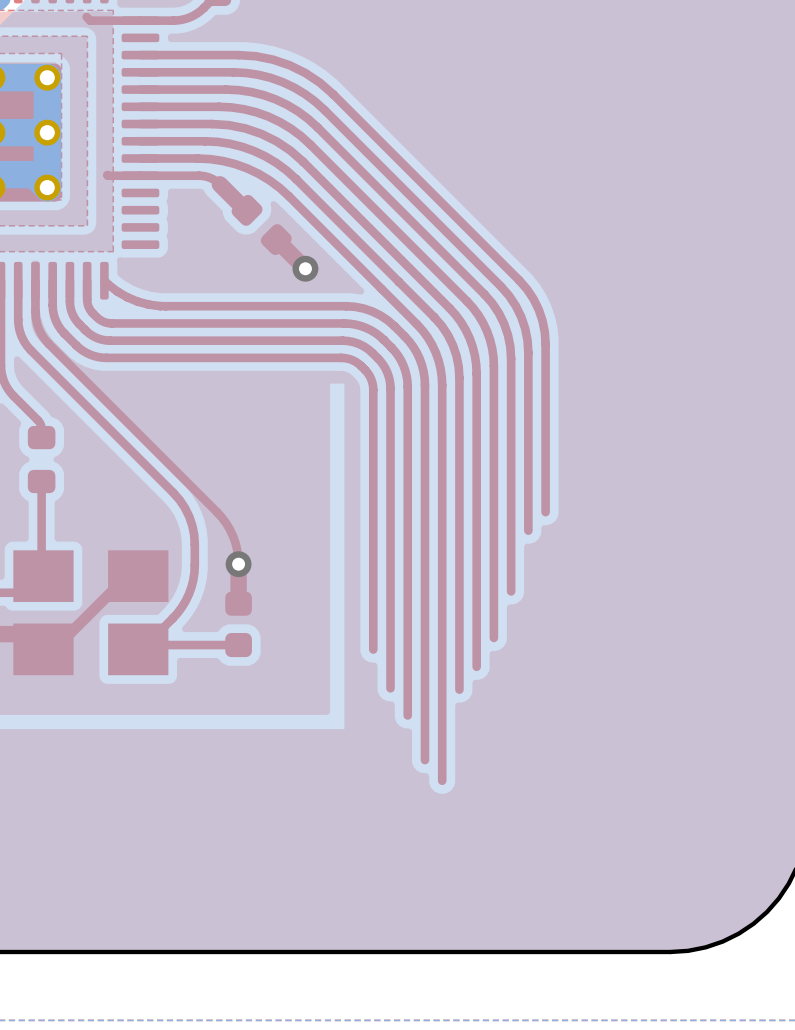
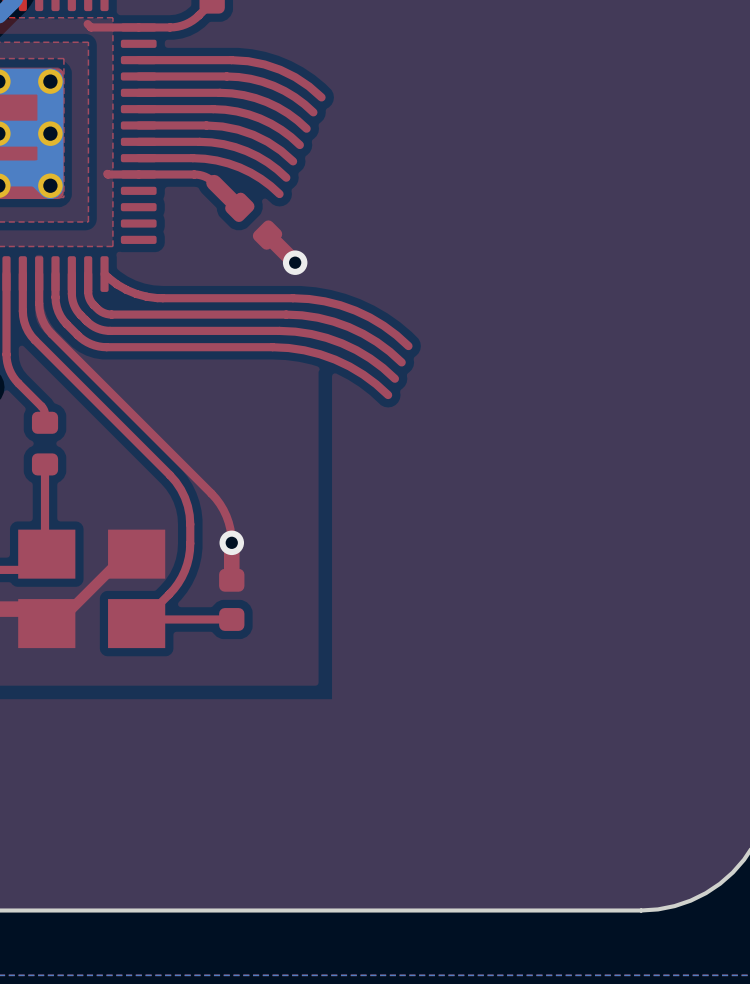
top track: (333, 94) (519, 280) (533, 298) (542, 320) (545, 344) (545, 512) -> none
top track: (324, 110) (500, 286) (508, 295) (521, 316) (525, 328) (528, 352) (528, 530) -> none
top track: (317, 127) (484, 294) (492, 303) (504, 323) (510, 346) (511, 358) (511, 591) -> none
top track: (310, 144) (467, 301) (478, 315) (486, 331) (492, 348) (493, 366) (493, 637) -> none
top track: (303, 161) (449, 308) (465, 329) (472, 346) (476, 373) (476, 666) -> none
top track: (296, 179) (434, 317) (447, 335) (456, 355) (459, 378) (459, 689) -> none
top track: (289, 196) (416, 324) (432, 344) (438, 360) (442, 385) (442, 780) -> none
top track: (303, 306) (354, 306) (380, 315) (409, 341) (422, 365) (424, 385) (424, 760) -> (292, 298) (324, 301) (355, 310) (383, 325) (408, 346)
top track: (295, 323) (349, 323) (365, 327) (379, 336) (391, 347) (401, 360) (405, 370) (407, 387) (407, 715) -> (286, 314) (318, 317) (348, 327) (376, 342) (401, 362)
top track: (288, 340) (342, 340) (358, 343) (378, 358) (388, 376) (390, 388) (390, 688) -> (279, 330) (311, 334) (341, 343) (370, 358) (394, 378)
top track: (281, 357) (348, 358) (361, 366) (372, 381) (373, 649) -> (272, 347) (304, 350) (335, 359) (363, 374) (388, 395)

